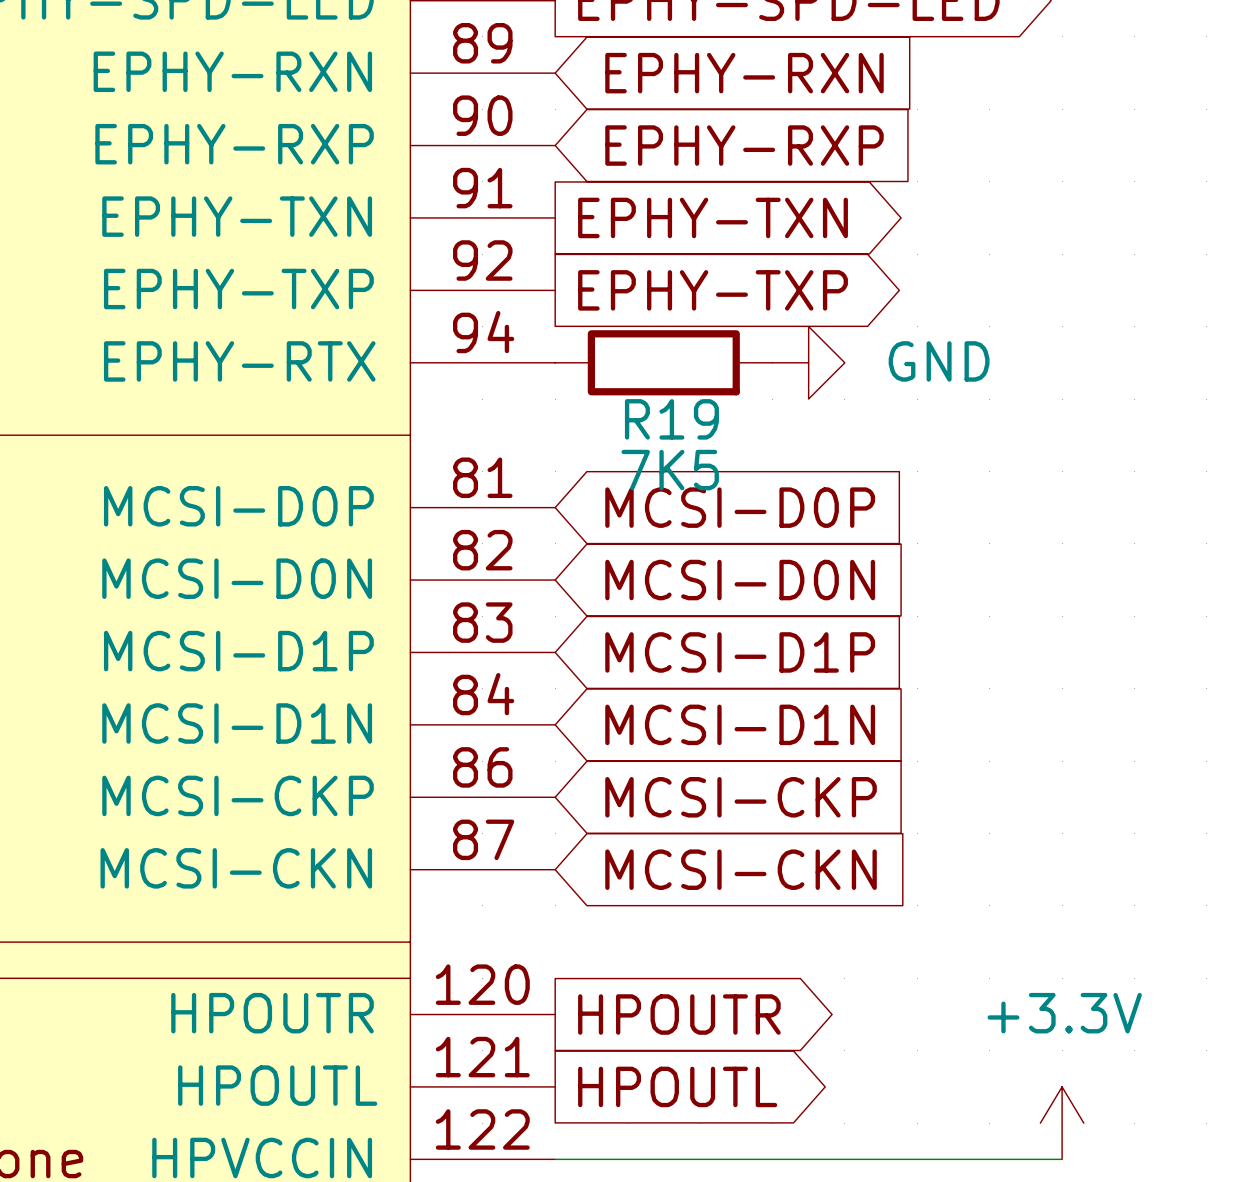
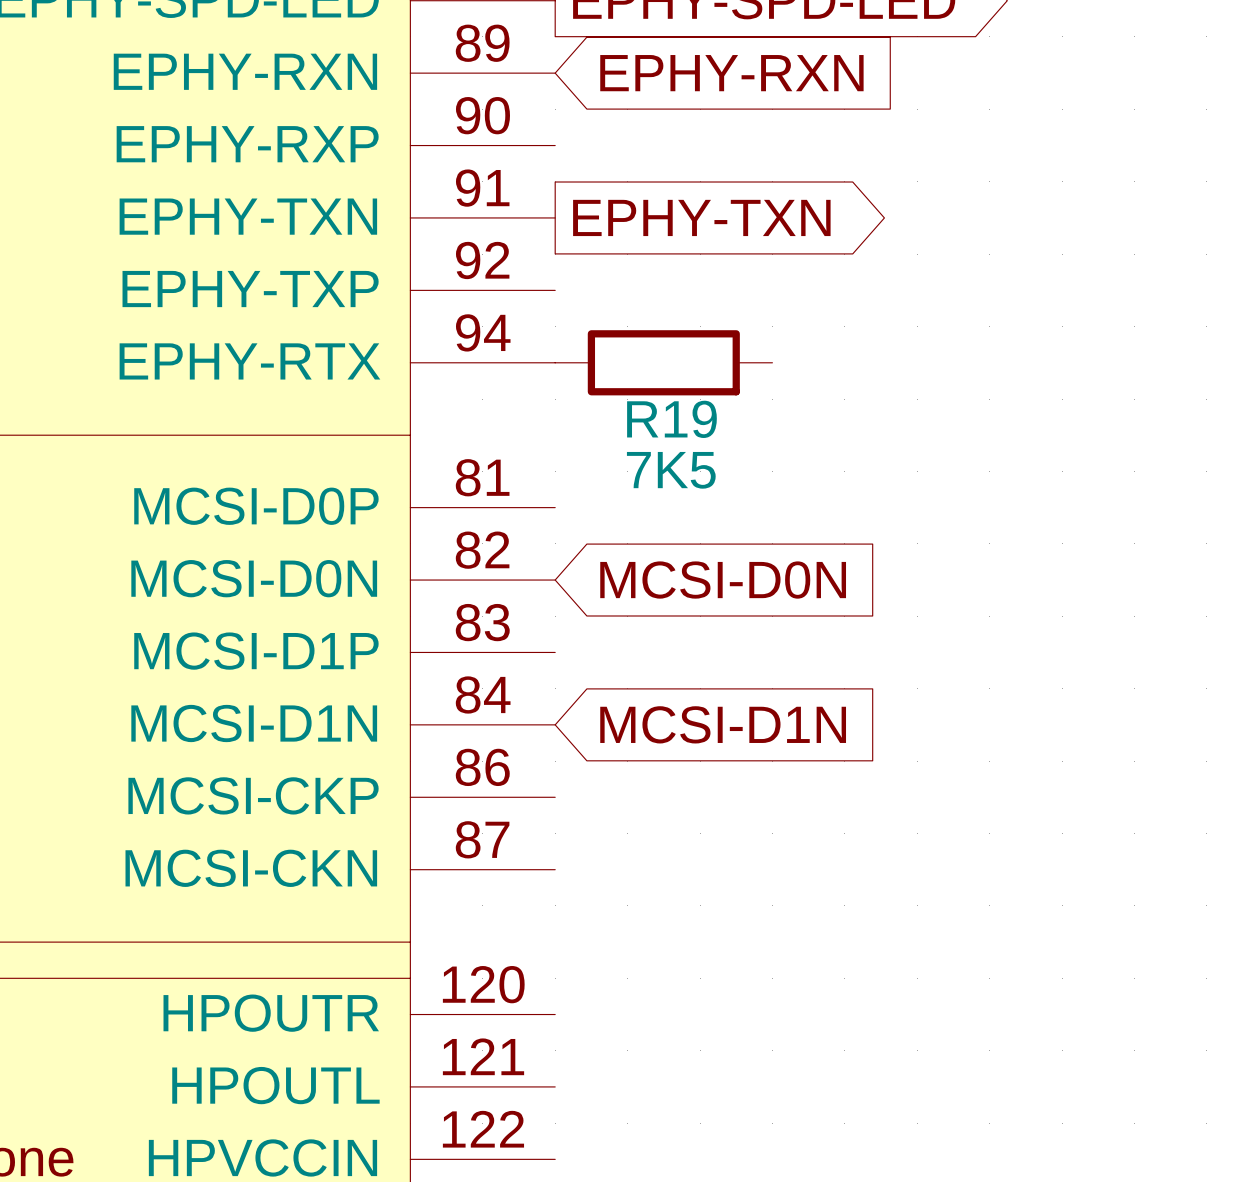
global label: EPHY-RXP (744, 145) -> none
global label: EPHY-TXP (713, 290) -> none
power symbol: GND (808, 362) -> none
global label: MCSI-D0P (740, 507) -> none
global label: MCSI-D1P (740, 652) -> none
global label: MCSI-CKP (741, 797) -> none
global label: MCSI-CKN (741, 869) -> none
global label: HPOUTR (679, 1014) -> none
global label: HPOUTL (677, 1086) -> none
power symbol: +3.3V (1062, 1123) -> none
wire: (555, 1159) (1062, 1159) -> none

